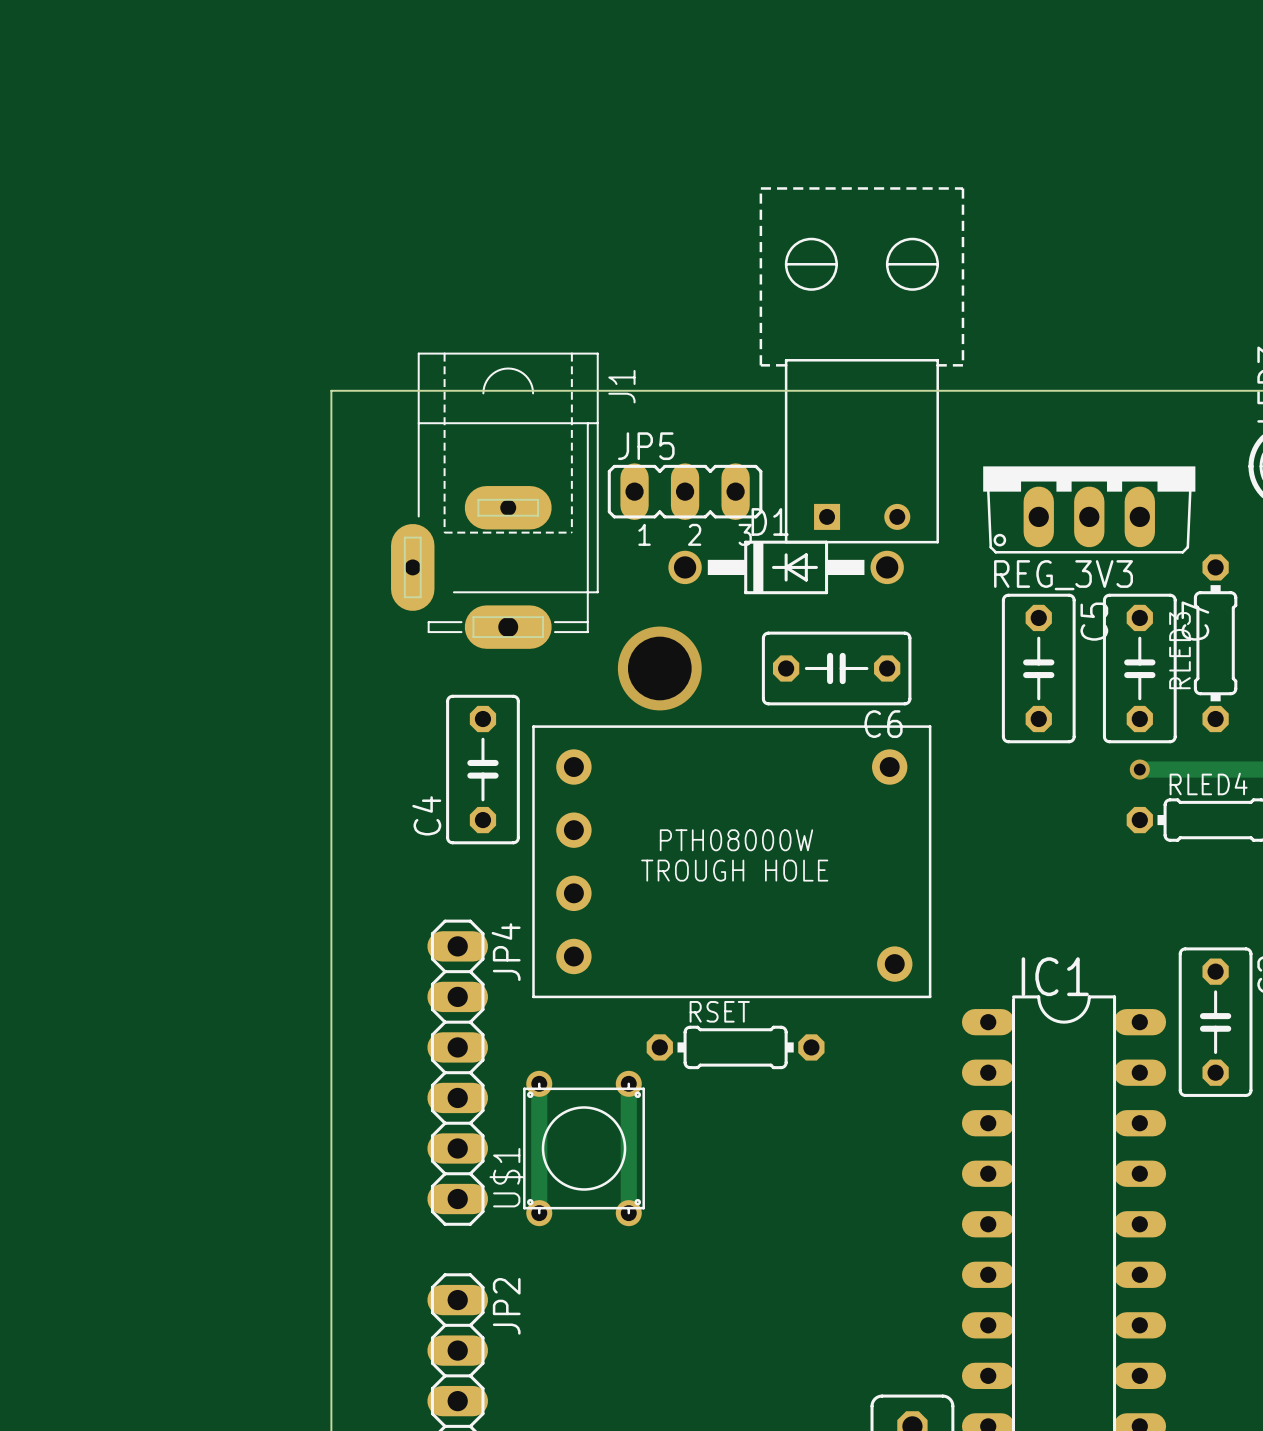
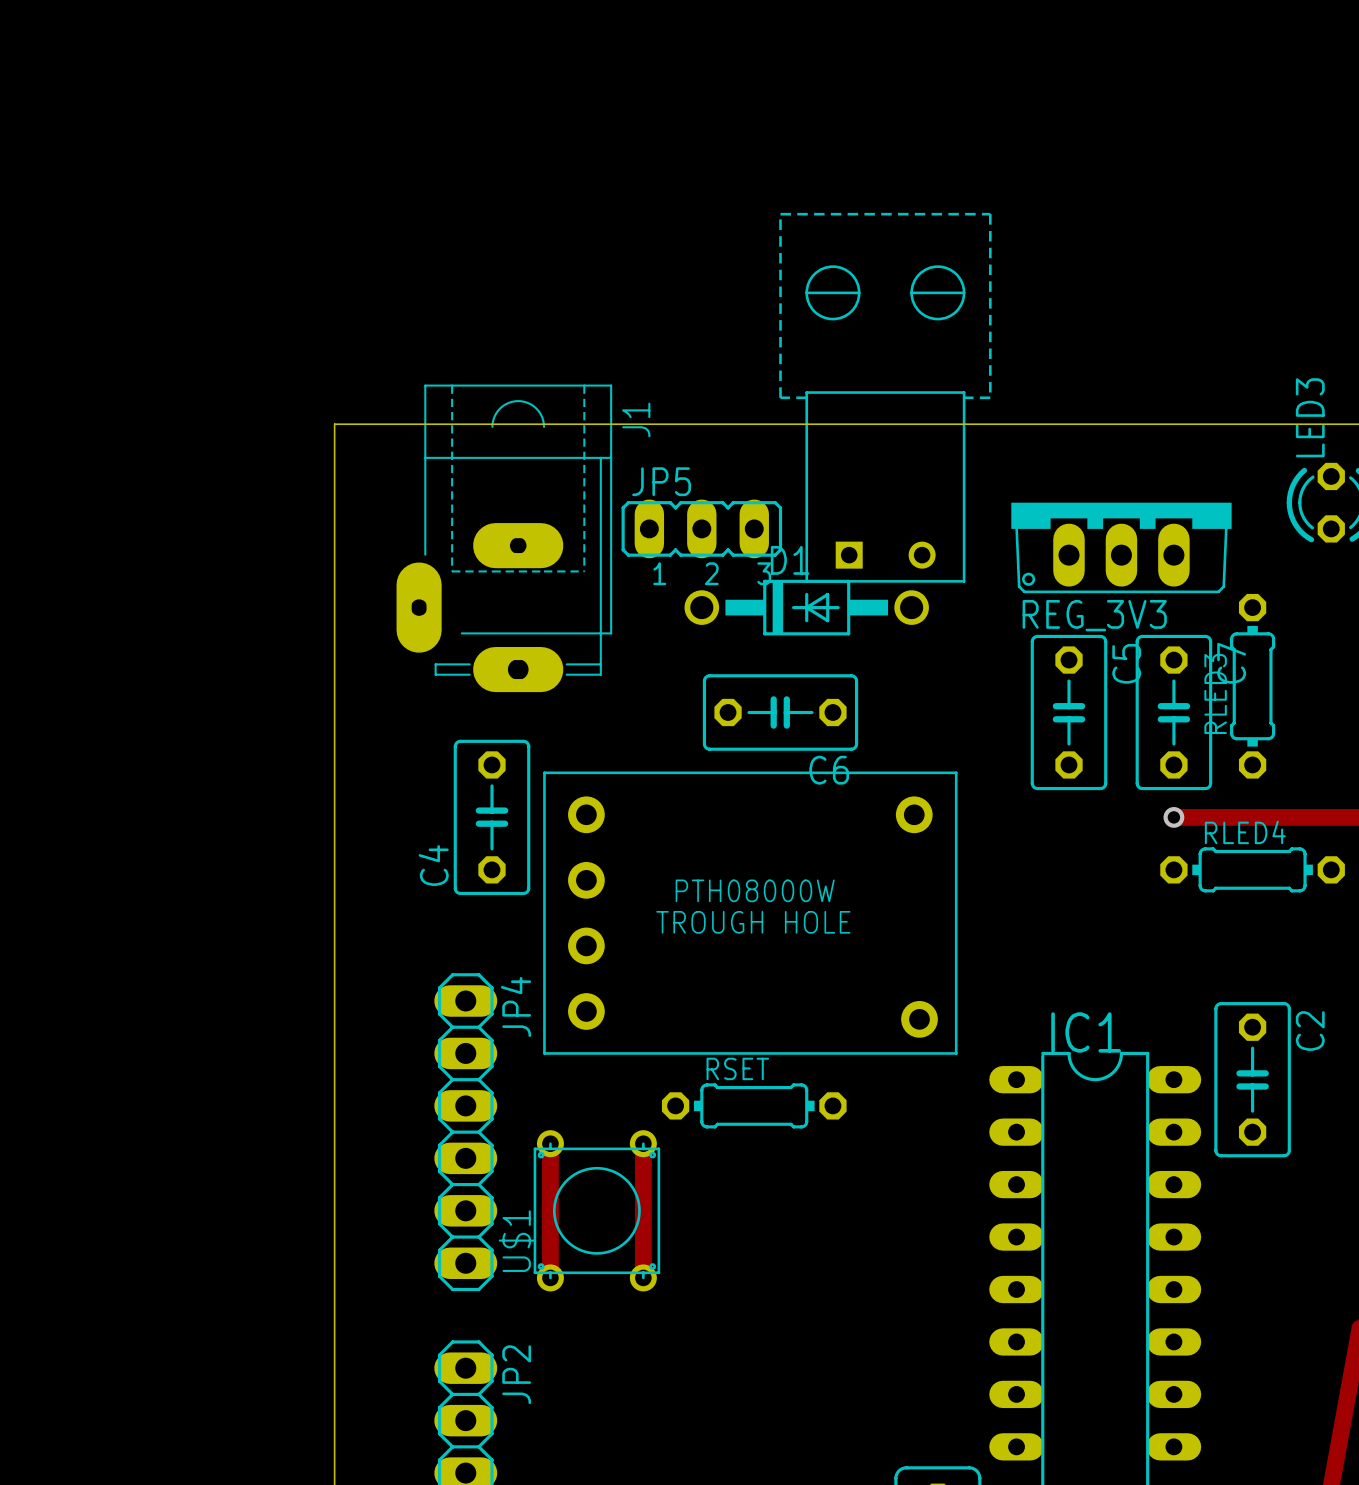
via: (659, 668) -> none
C6 position: (836, 668) -> (780, 712)

